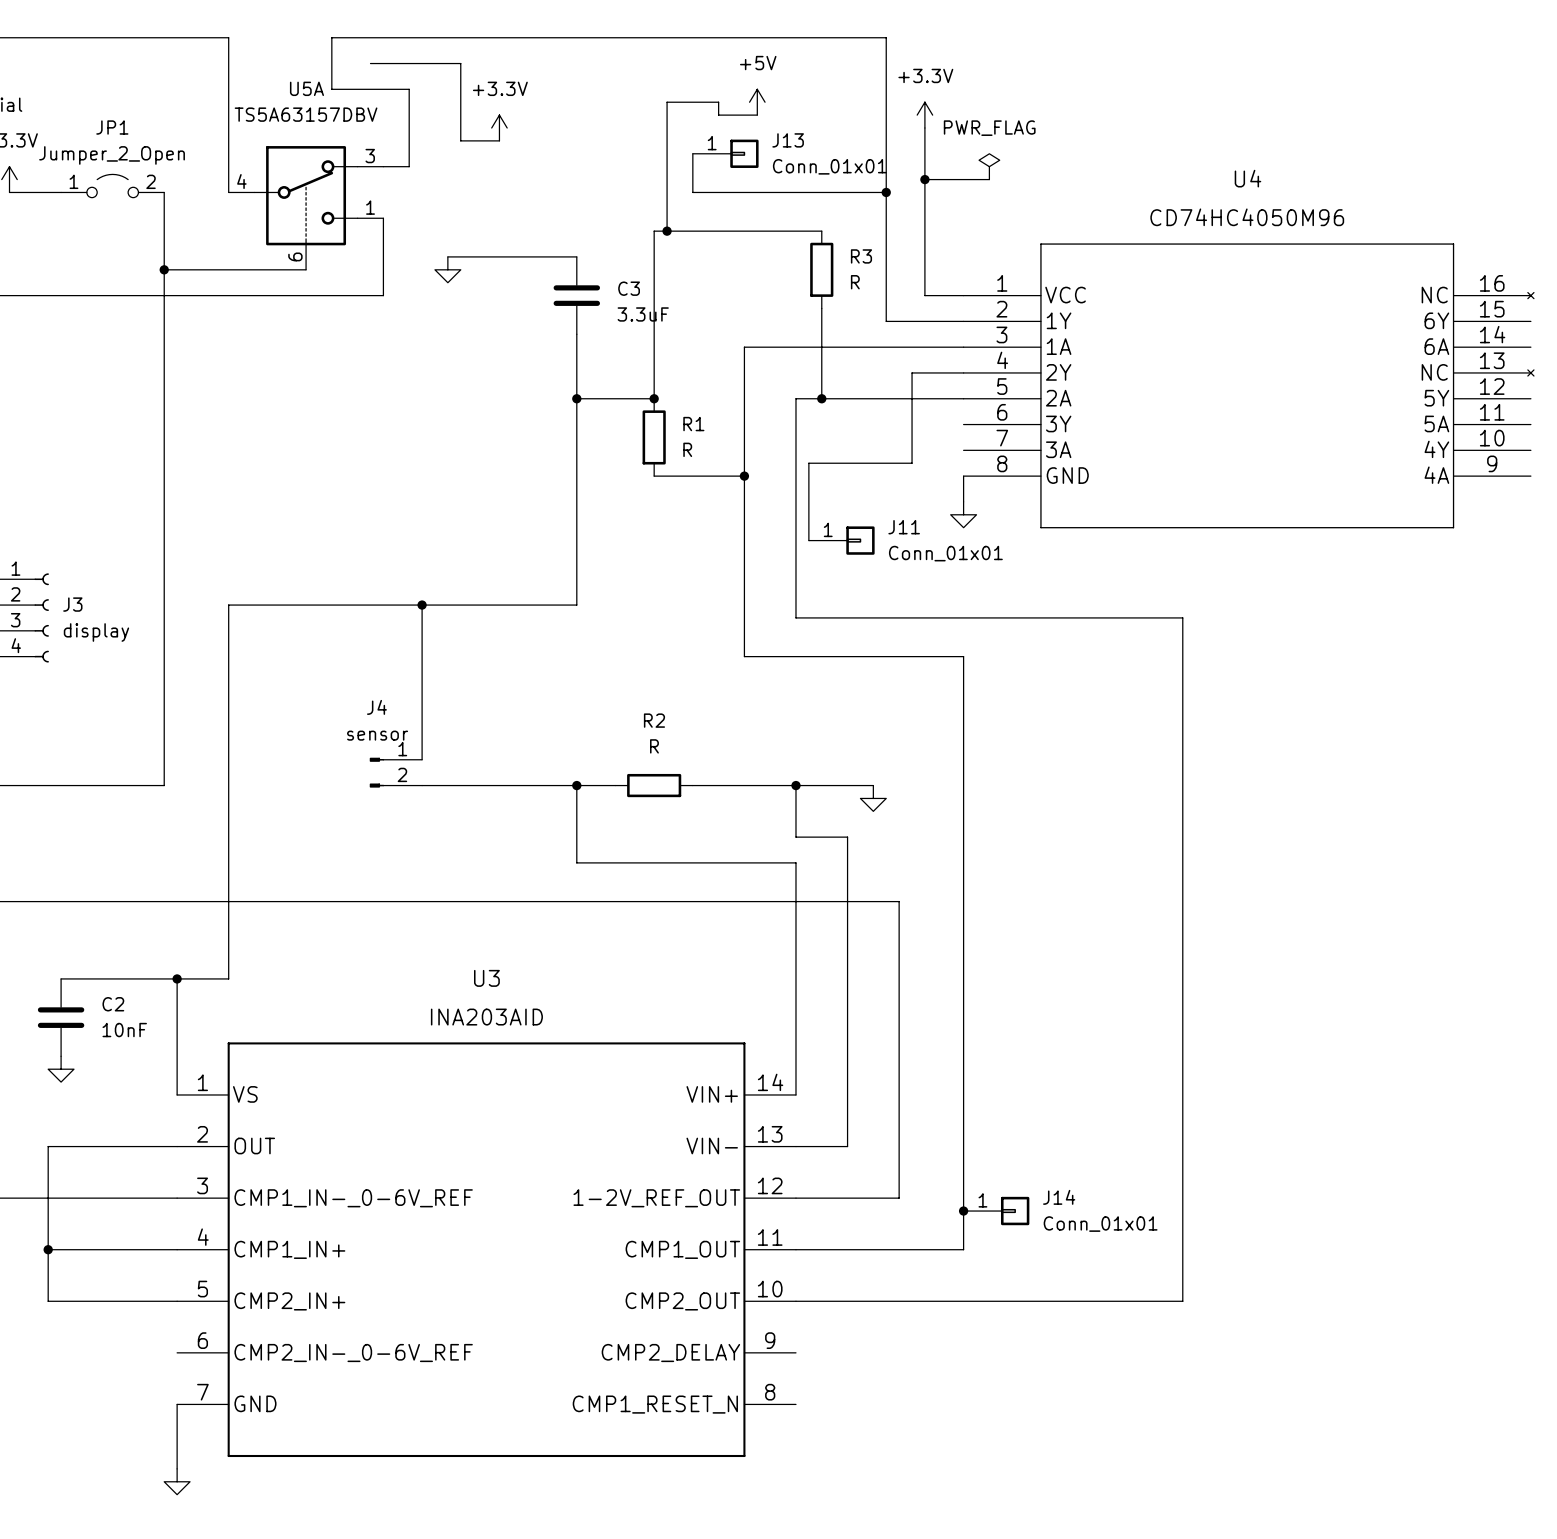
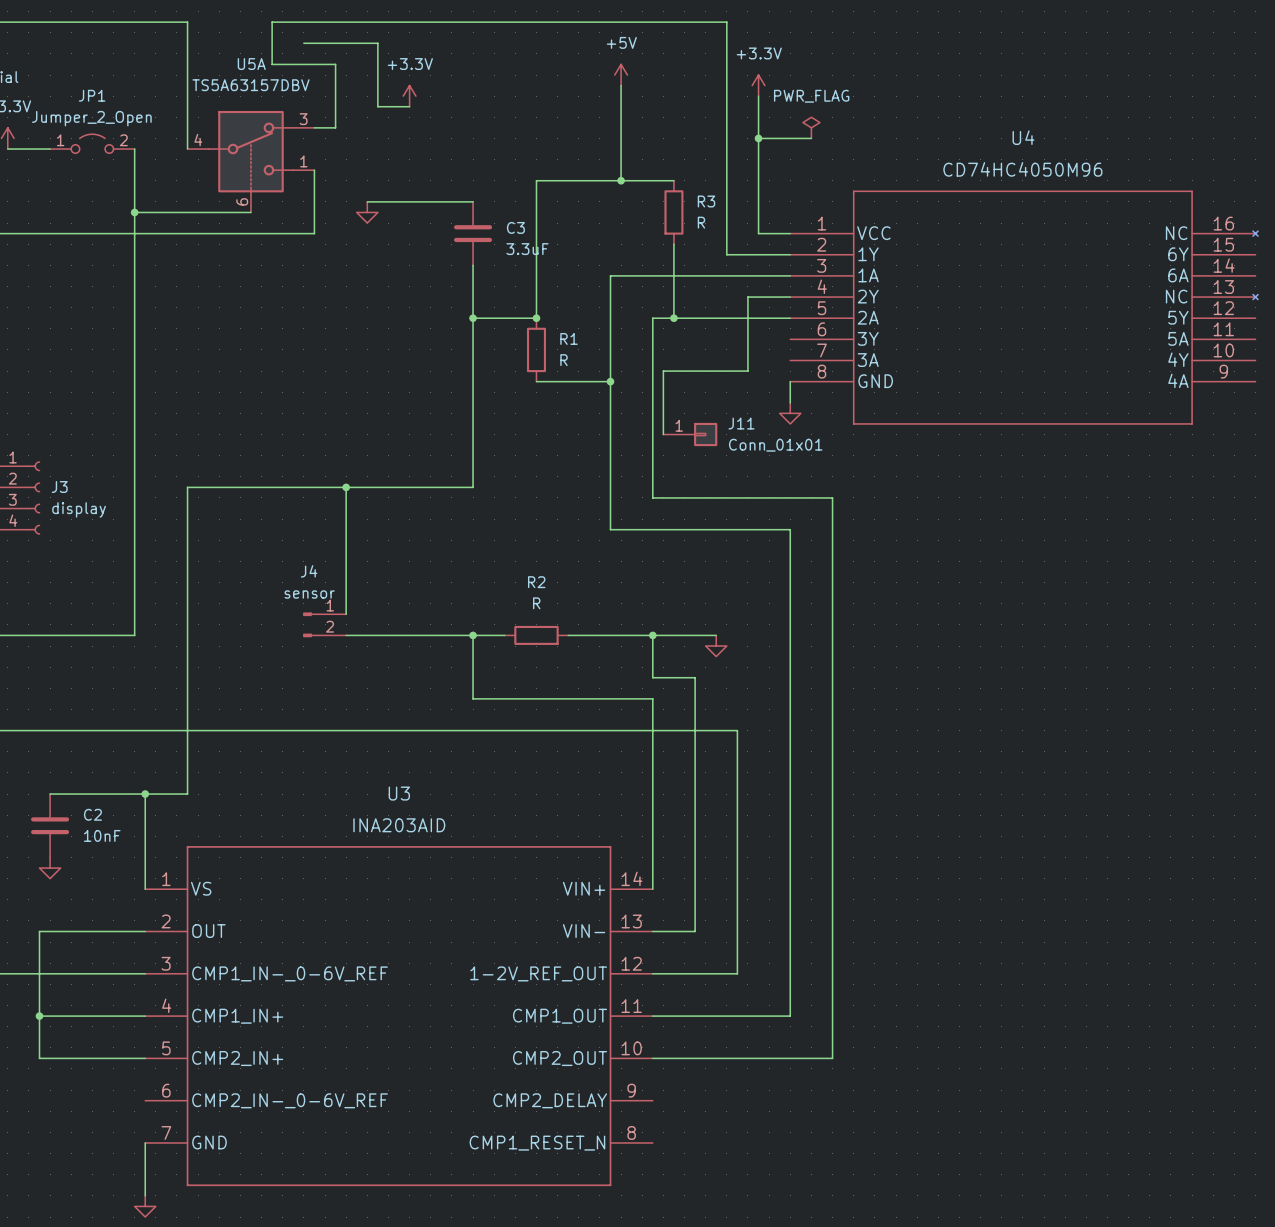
wire: (757, 115) (718, 115) (718, 102) (667, 102) (667, 231) -> (621, 85) (621, 180)
wire: (692, 153) (692, 192) (886, 192) -> none
J13: Conn_01x01 (725, 153) -> none
junction: (886, 192) -> none
junction: (667, 231) -> none
junction: none -> (621, 180)
wire: (1015, 617) (1182, 617) (1182, 1301) (1015, 1301) -> (832, 497) (832, 1058)
junction: (963, 1211) -> none
J14: Conn_01x01 (996, 1211) -> none

